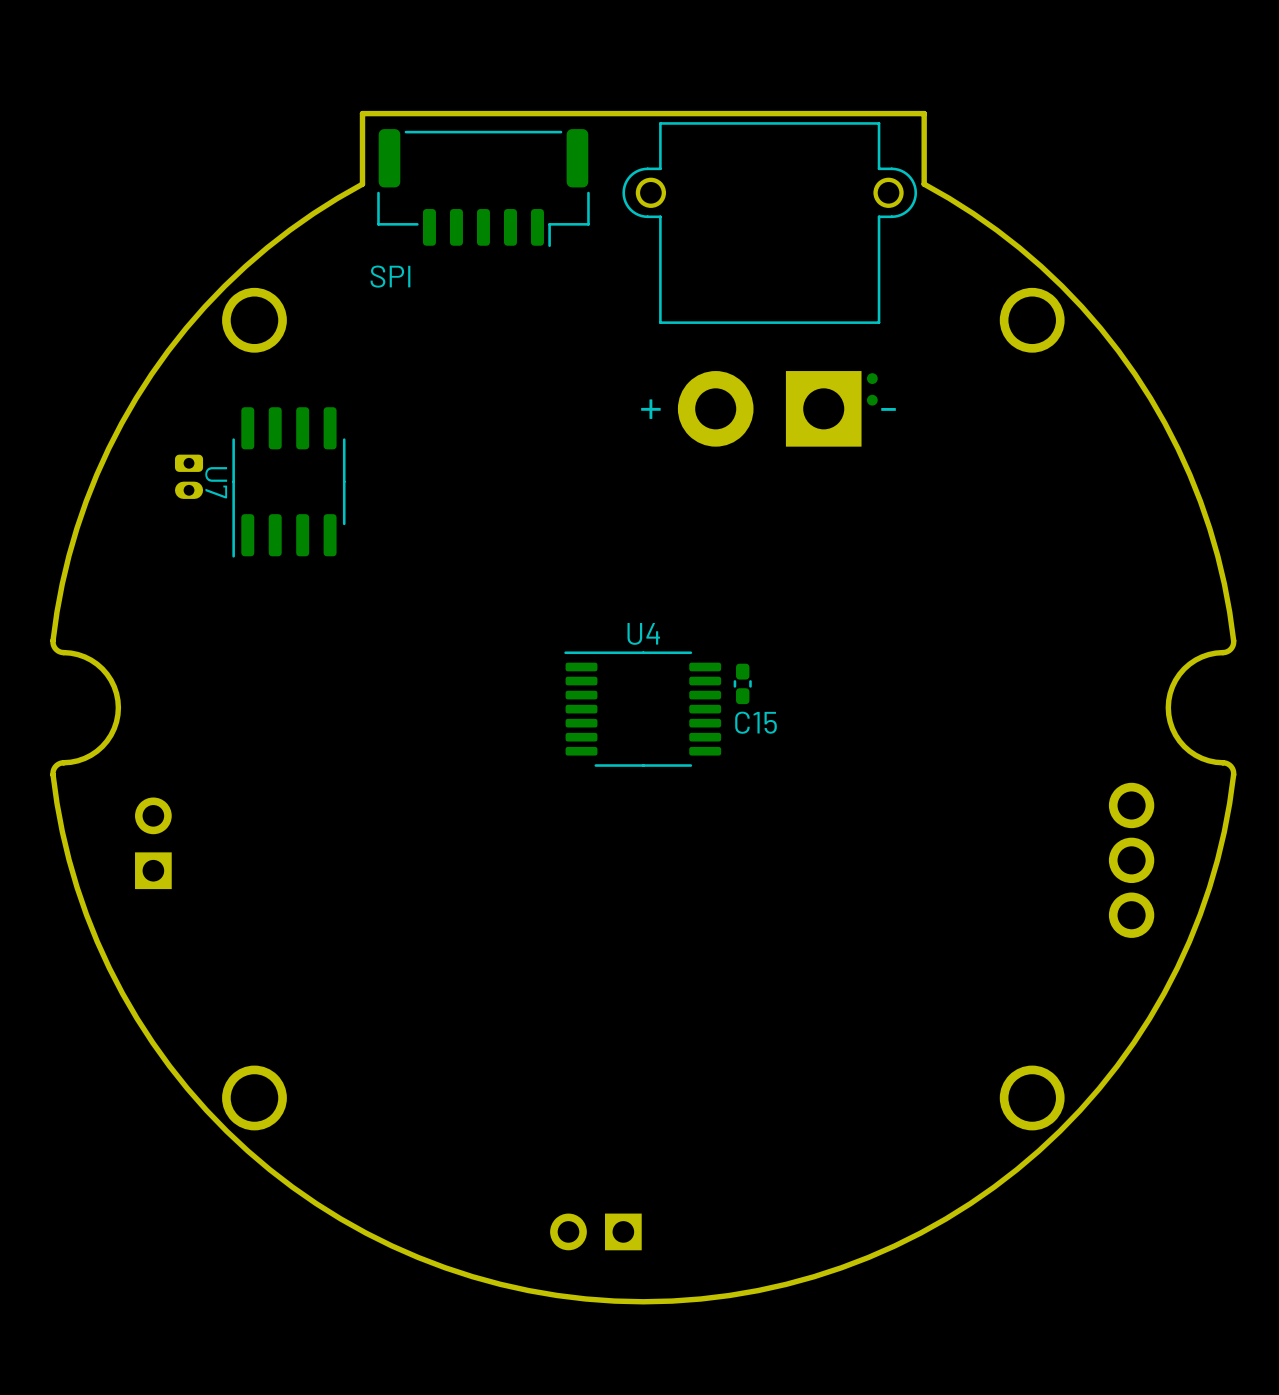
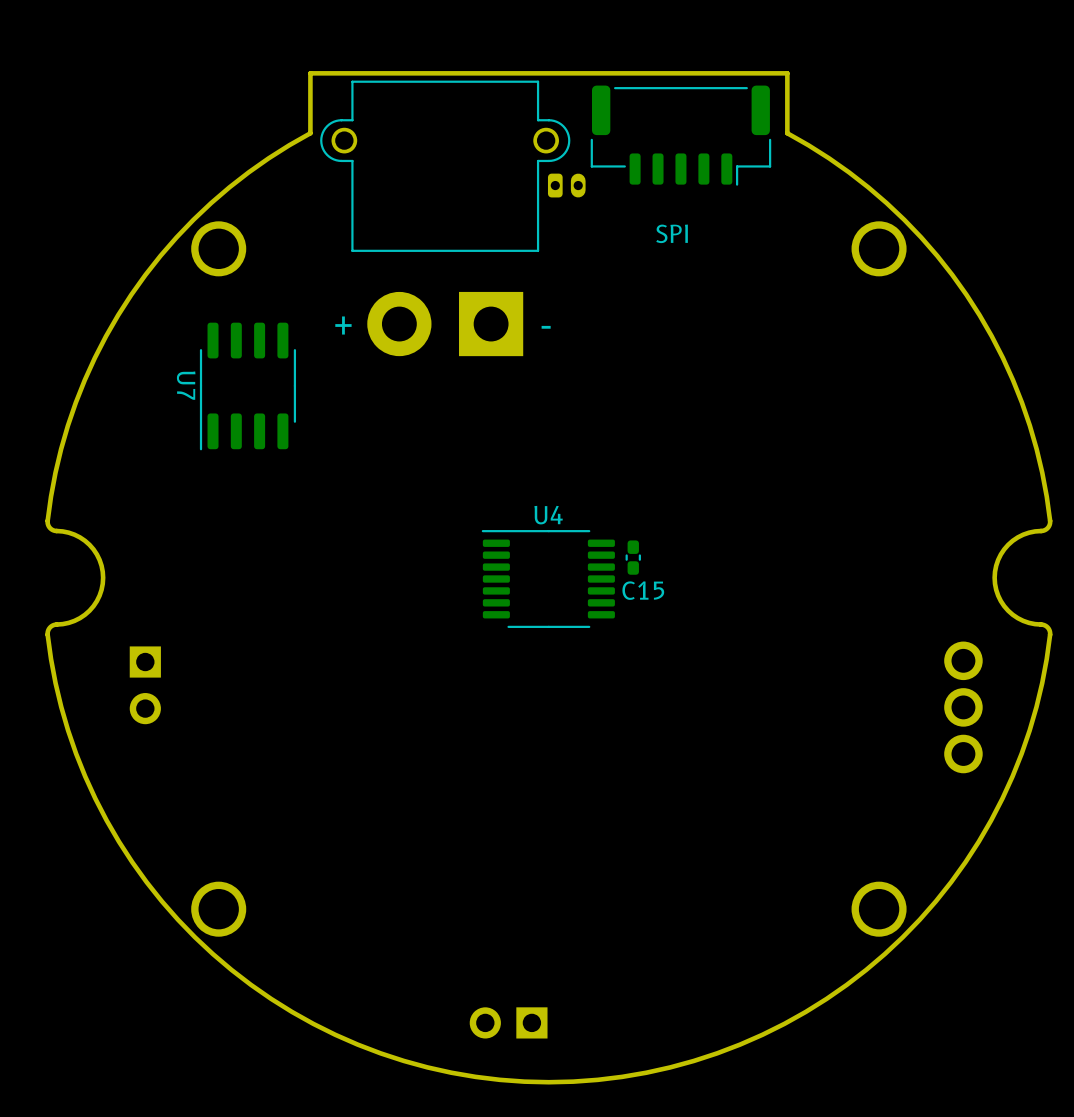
part position: (483, 188) -> (680, 135)
text position: SPI (390, 276) -> SPI (672, 233)
part position: (769, 284) -> (445, 218)
part: (872, 389) -> none
part rotation: 0° (189, 476) -> 90° counterclockwise (566, 185)
part position: (189, 476) -> (566, 185)
part rotation: 0° (153, 843) -> 180° (145, 685)

